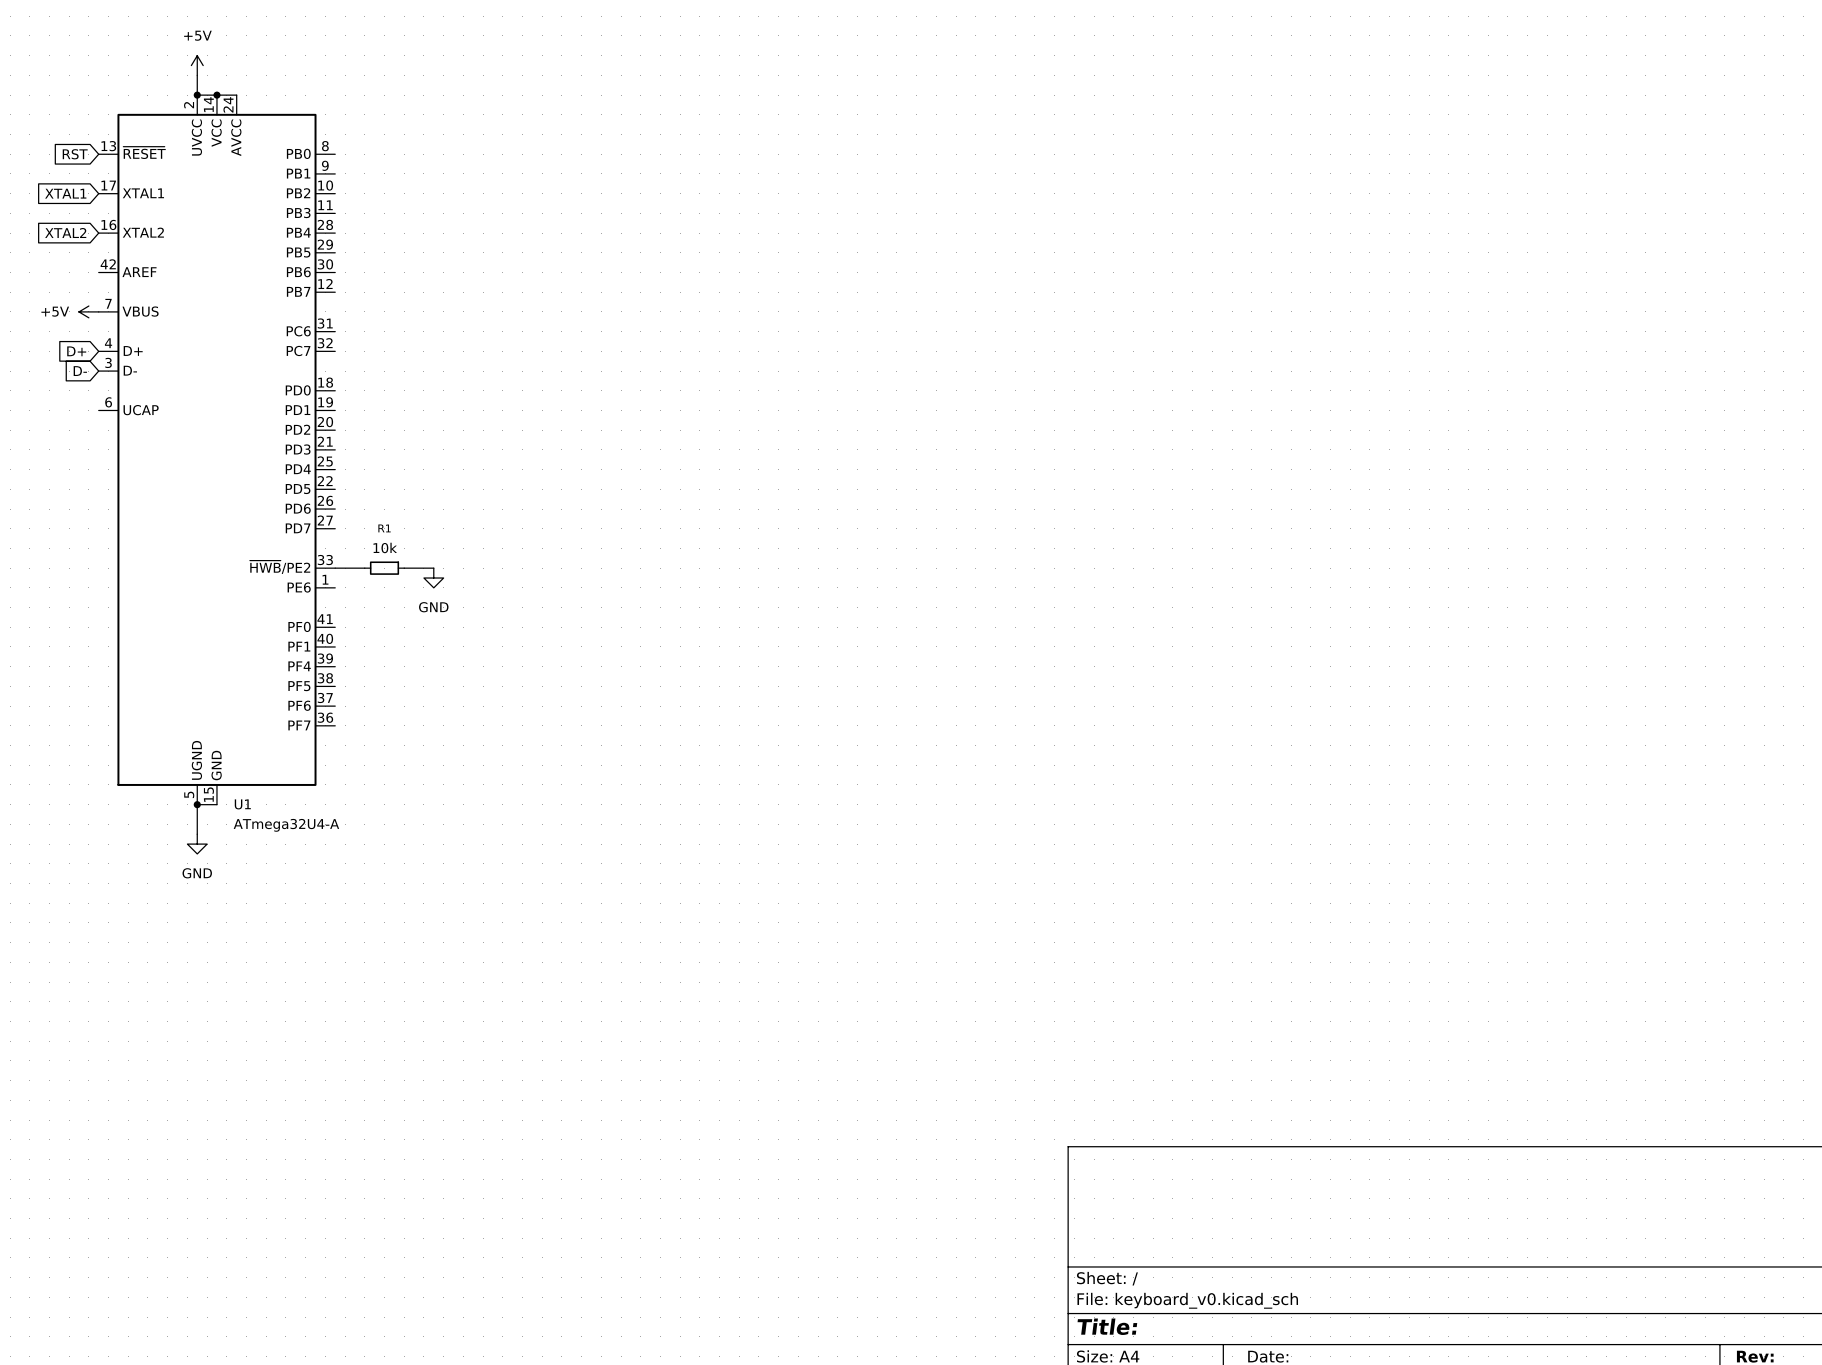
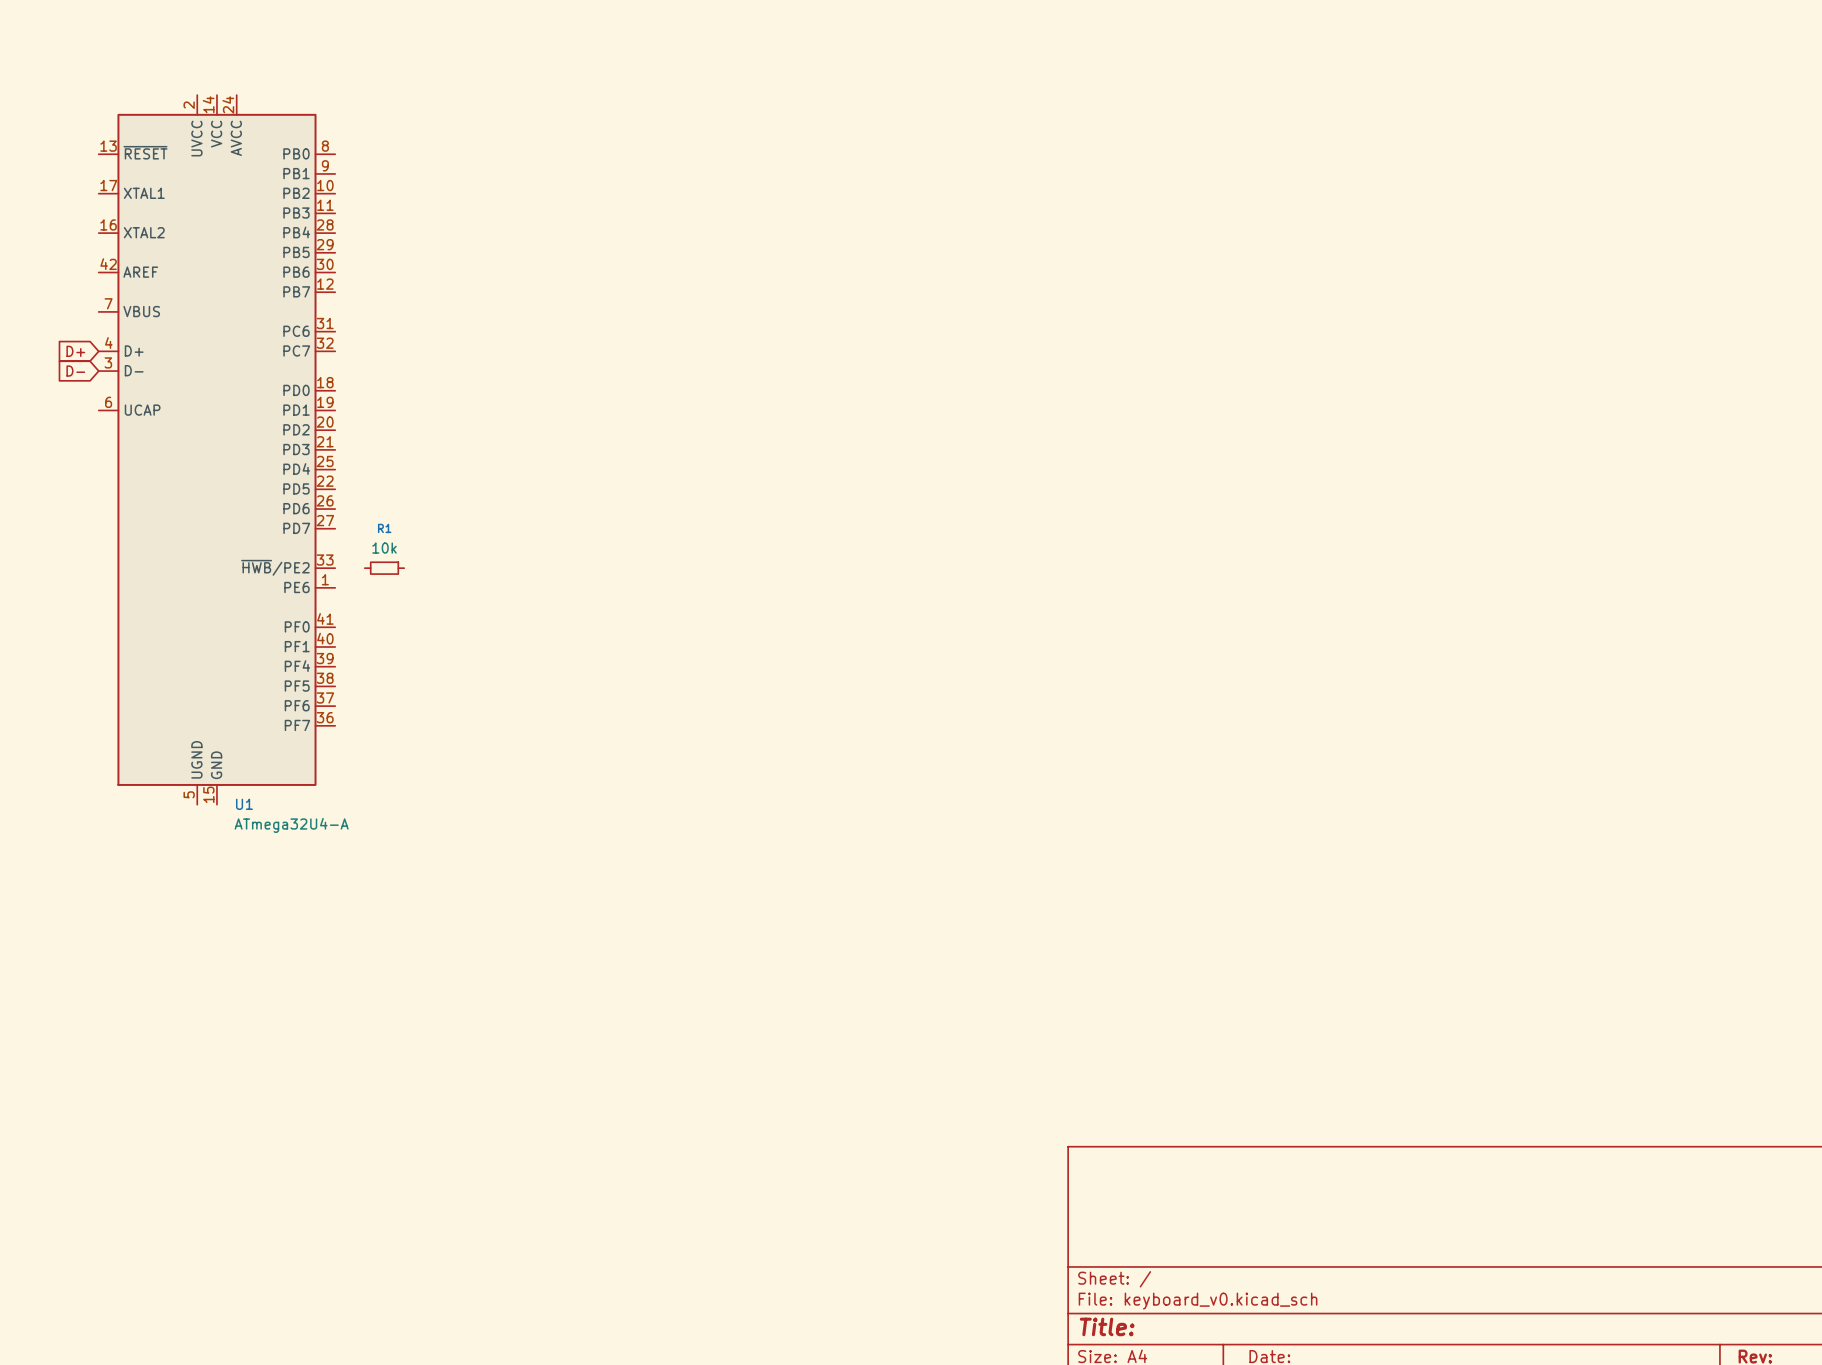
power symbol: +5V (197, 65) -> none
wire: (197, 75) (197, 95) (236, 95) -> none
junction: (197, 95) -> none
junction: (216, 95) -> none
global label: RST (75, 154) -> none
global label: XTAL1 (65, 193) -> none
global label: XTAL2 (65, 233) -> none
power symbol: +5V (88, 311) -> none
wire: (335, 568) (364, 568) -> none
wire: (404, 568) (433, 568) -> none
power symbol: GND (433, 578) -> none
junction: (197, 804) -> none
wire: (216, 804) (197, 804) (197, 834) -> none
power symbol: GND (197, 844) -> none

